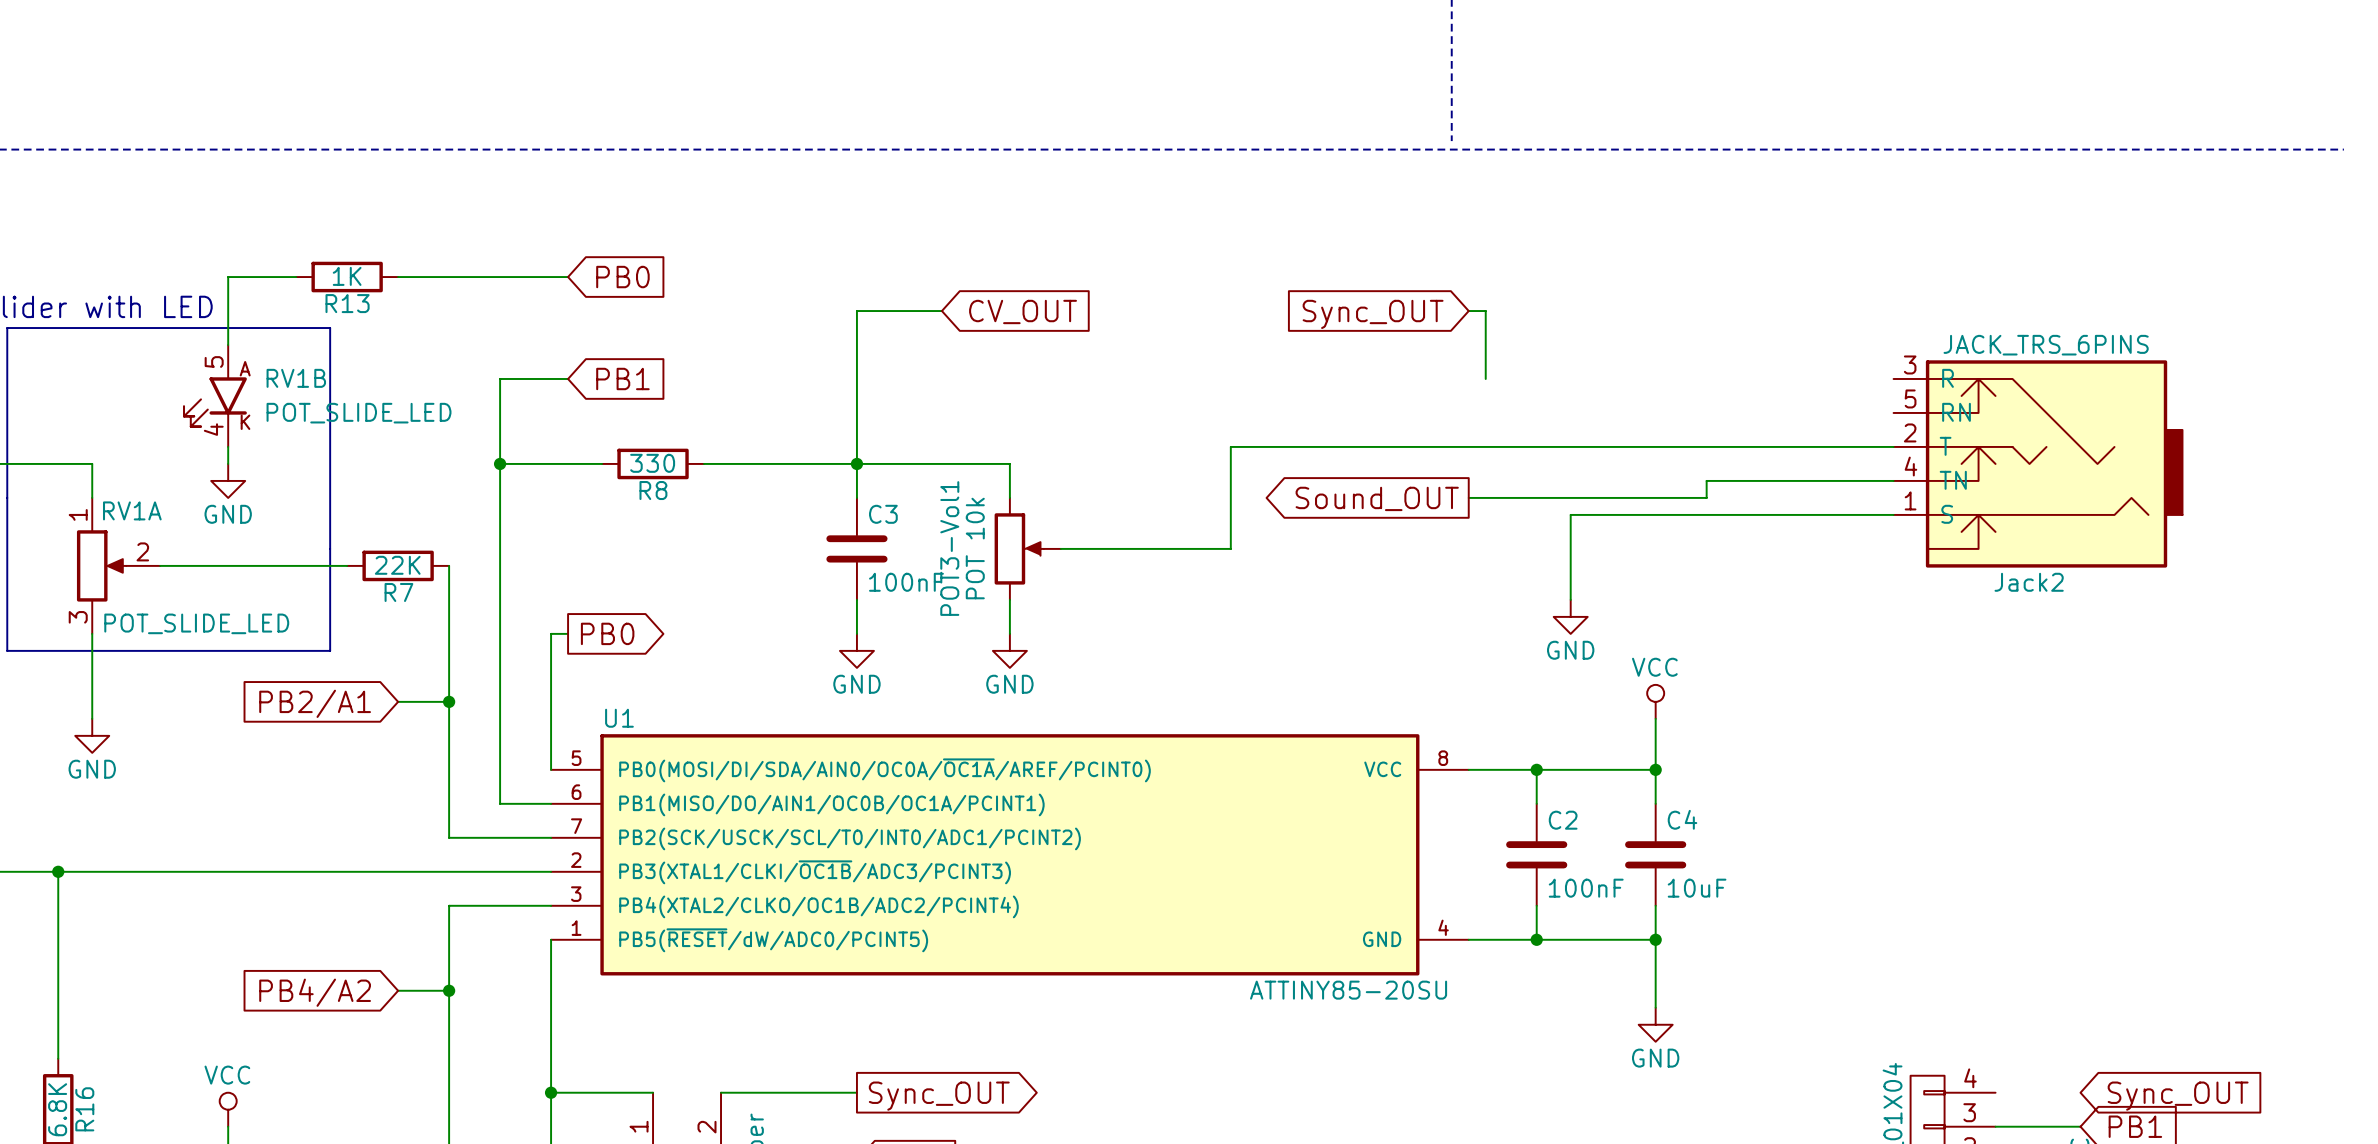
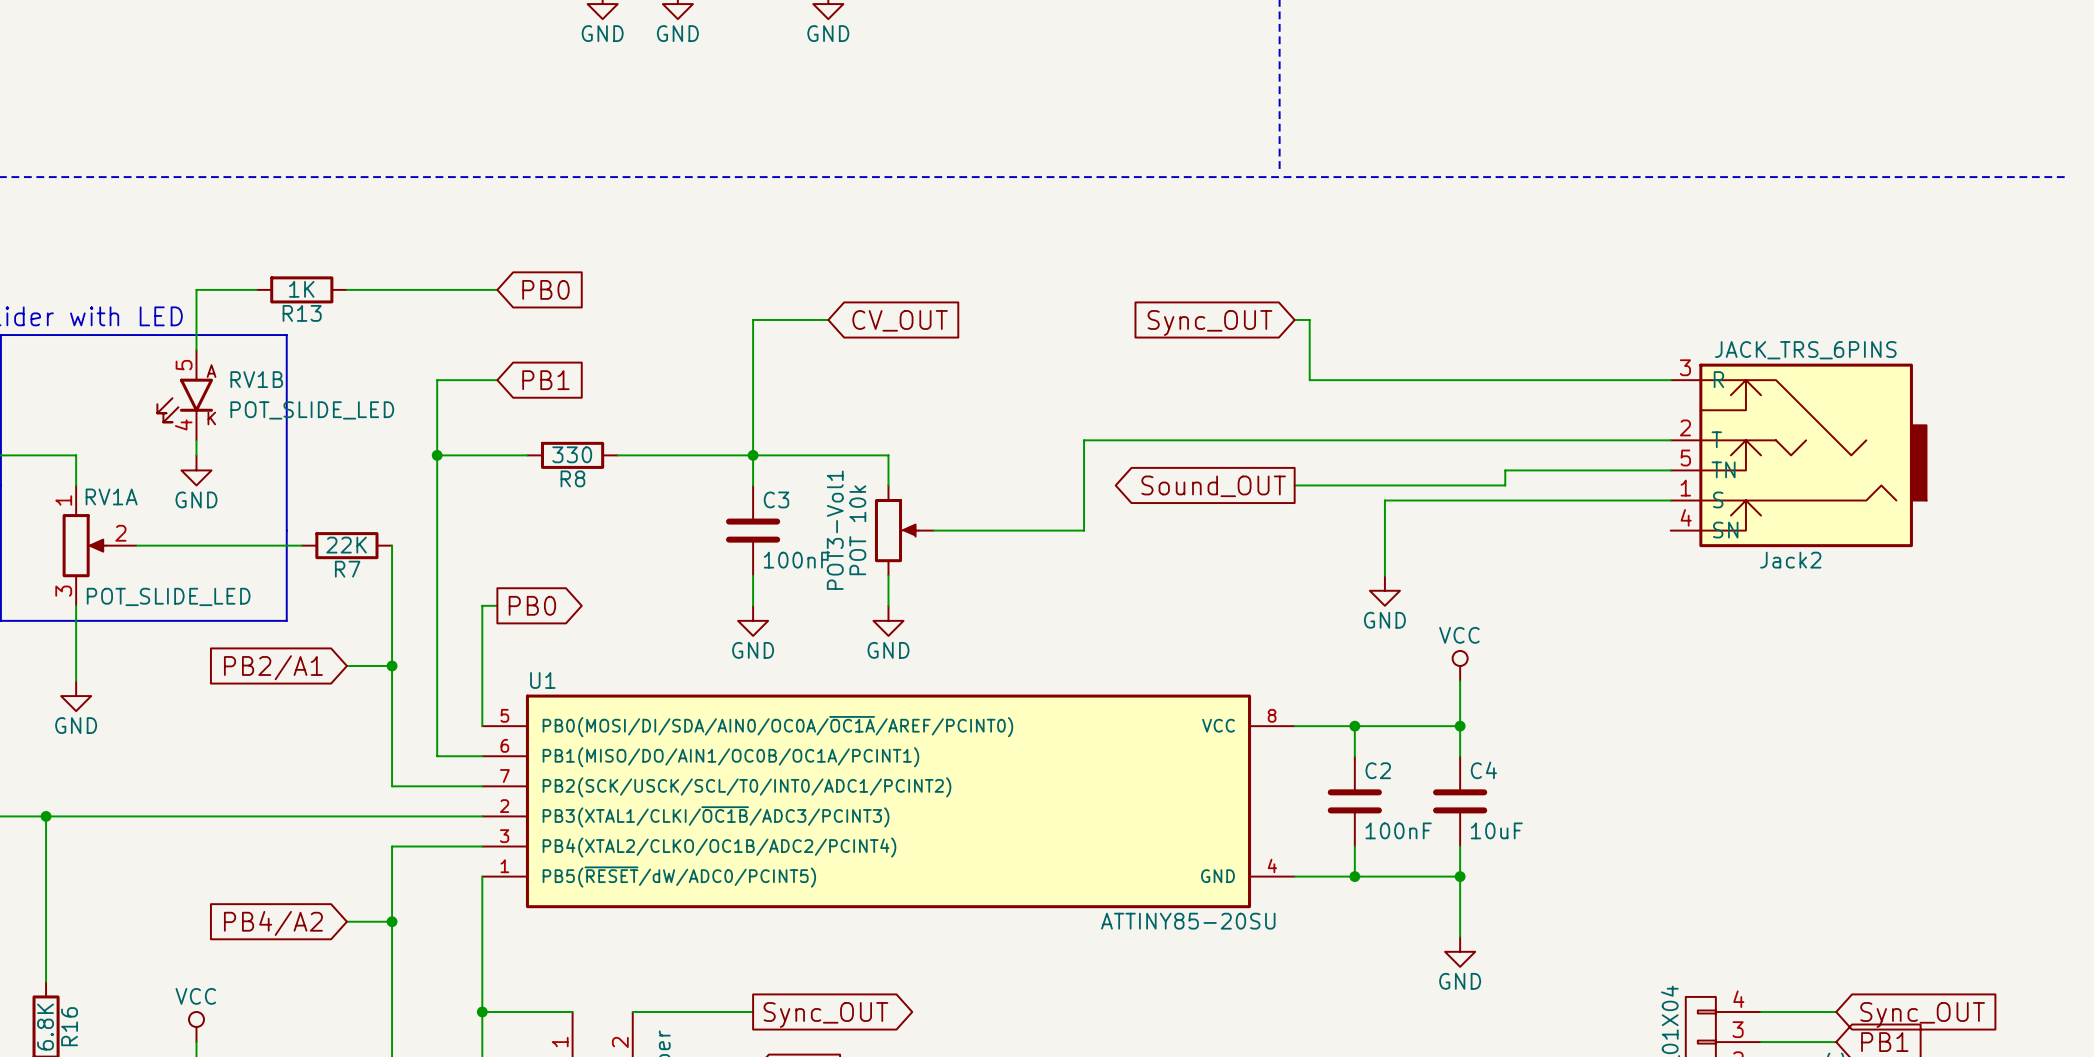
Jack2 symbol: [1893, 360, 2183, 568] -> [1670, 363, 1927, 548]
wire: none -> (1309, 380) (1670, 380)
wire: none -> (1761, 1011) (1836, 1011)

